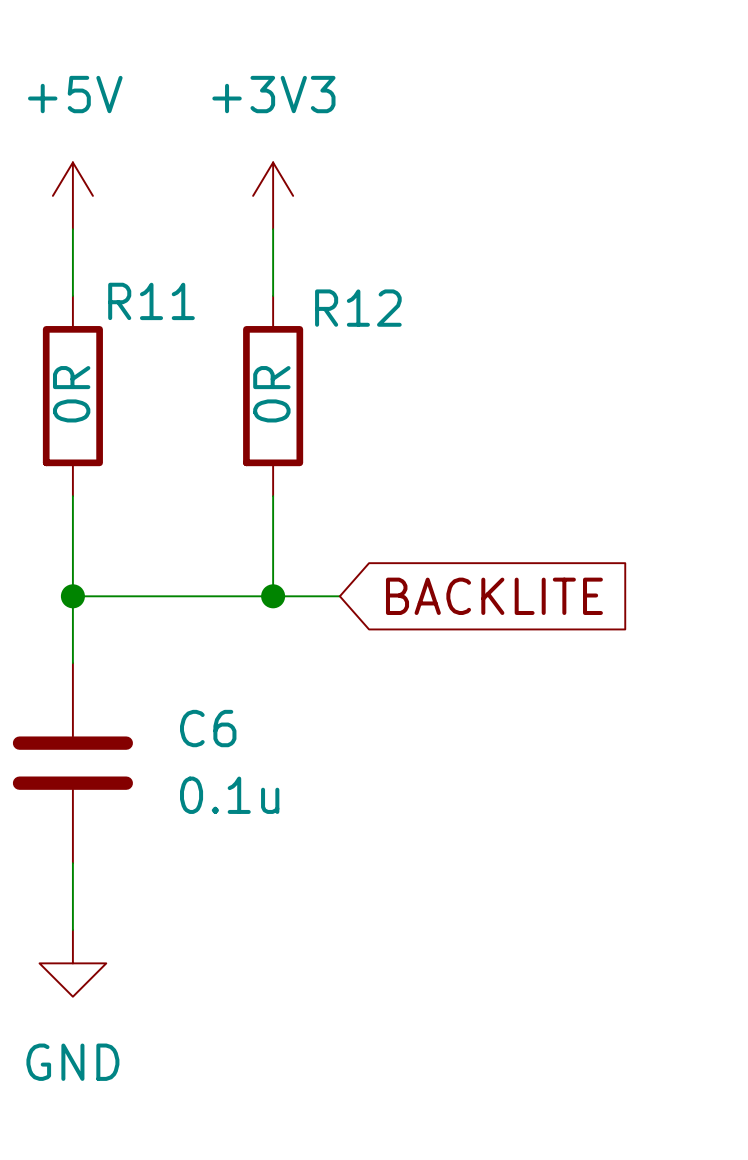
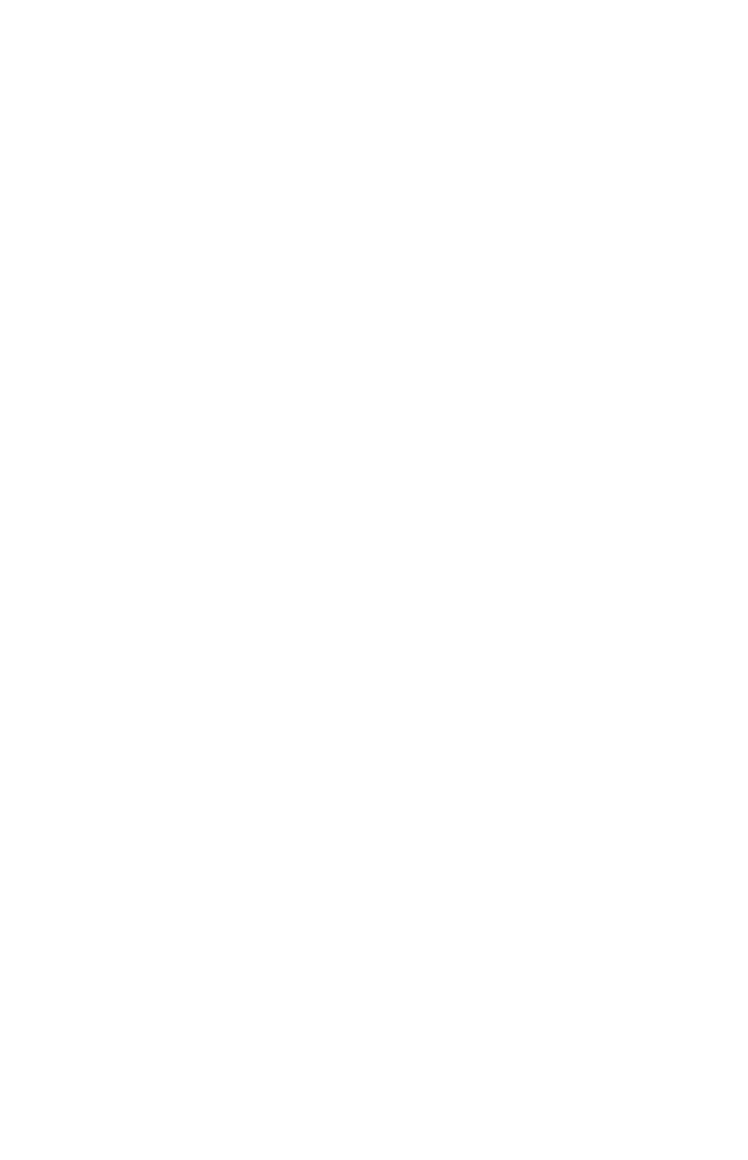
power symbol: +5V (72, 195) -> none
power symbol: +3V3 (273, 195) -> none
wire: (72, 229) (72, 295) -> none
wire: (273, 229) (273, 295) -> none
R11: 0R (72, 396) -> none
R12: 0R (273, 396) -> none
wire: (72, 496) (72, 663) -> none
wire: (273, 496) (273, 596) -> none
wire: (72, 596) (339, 596) -> none
junction: (72, 596) -> none
junction: (273, 596) -> none
global label: BACKLITE (494, 596) -> none
C6: 0.1u (72, 763) -> none
wire: (72, 863) (72, 929) -> none
power symbol: GND (72, 963) -> none

